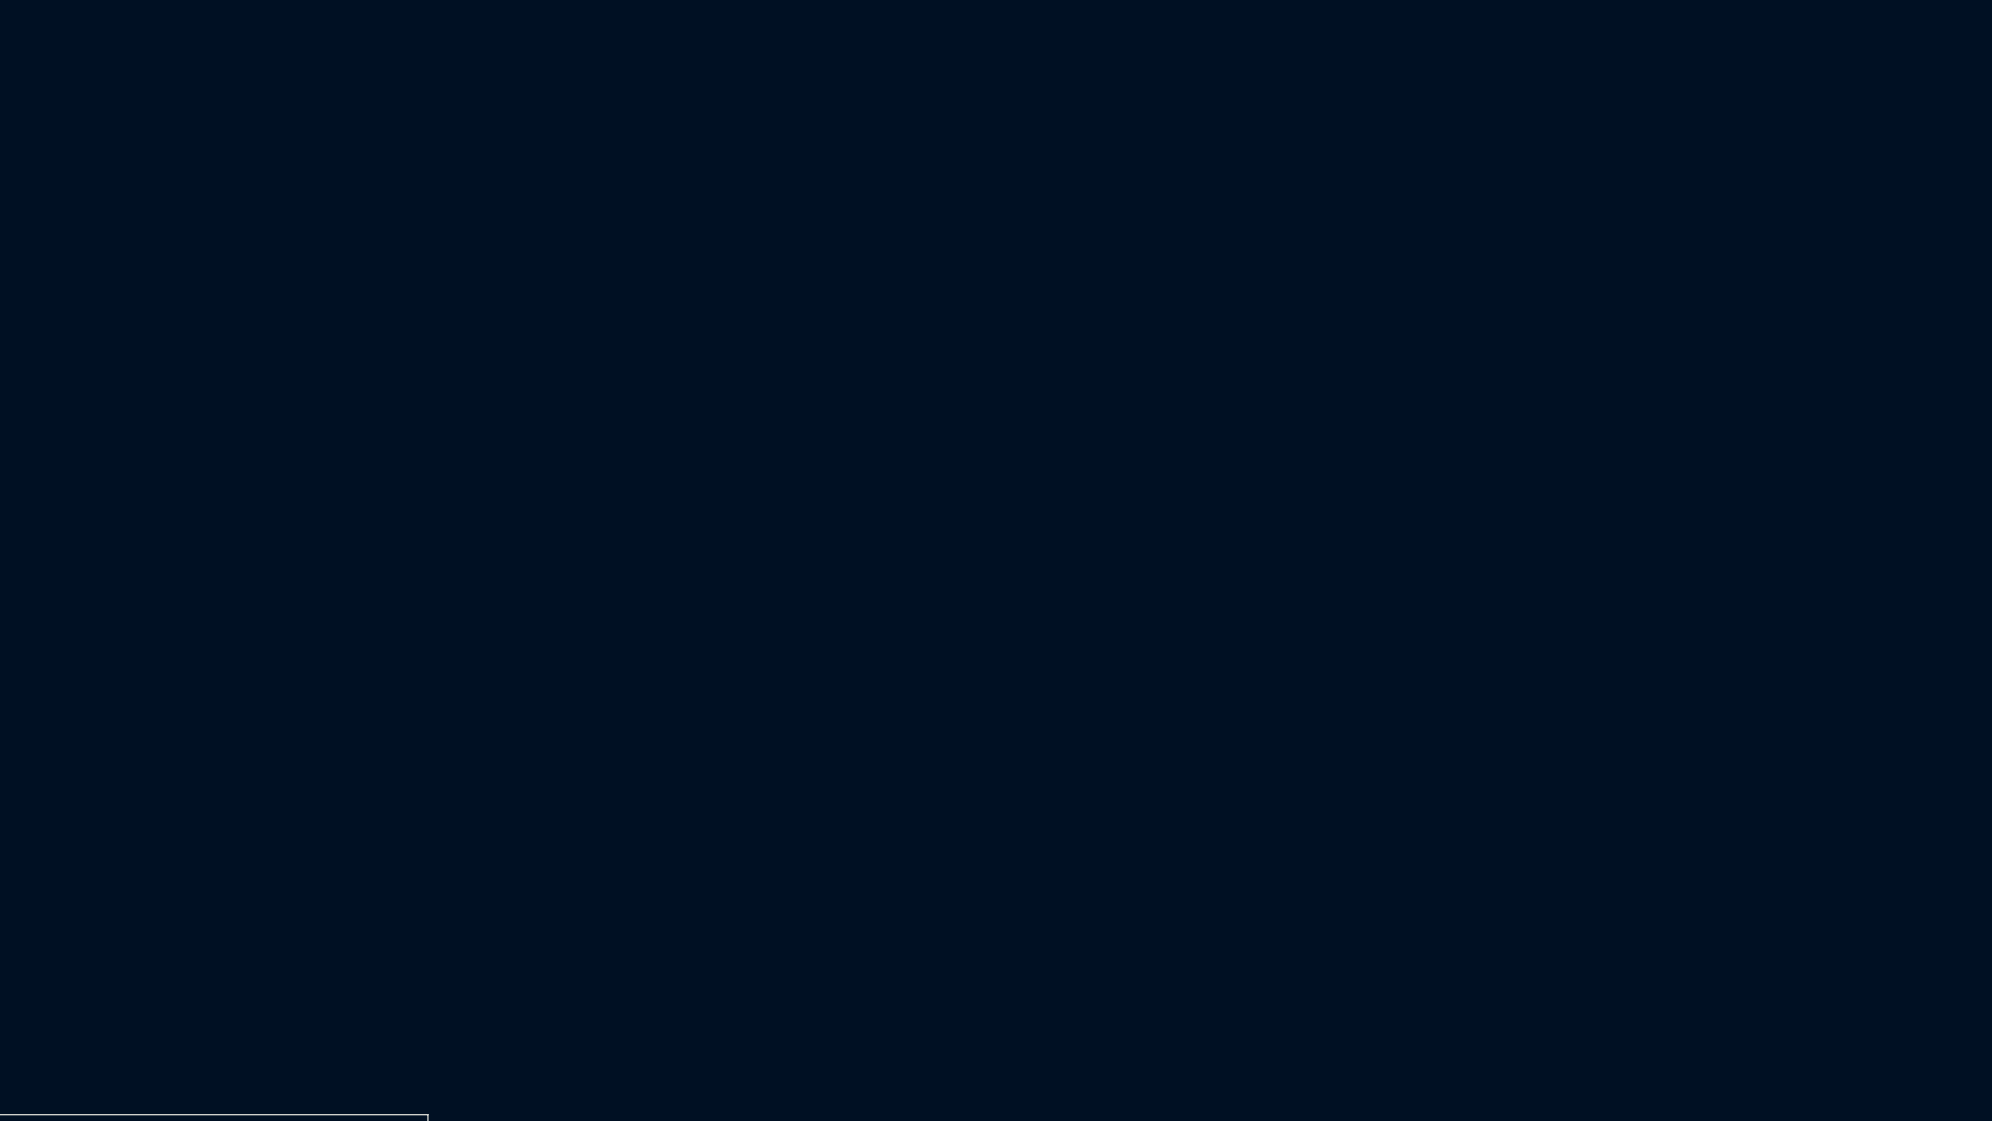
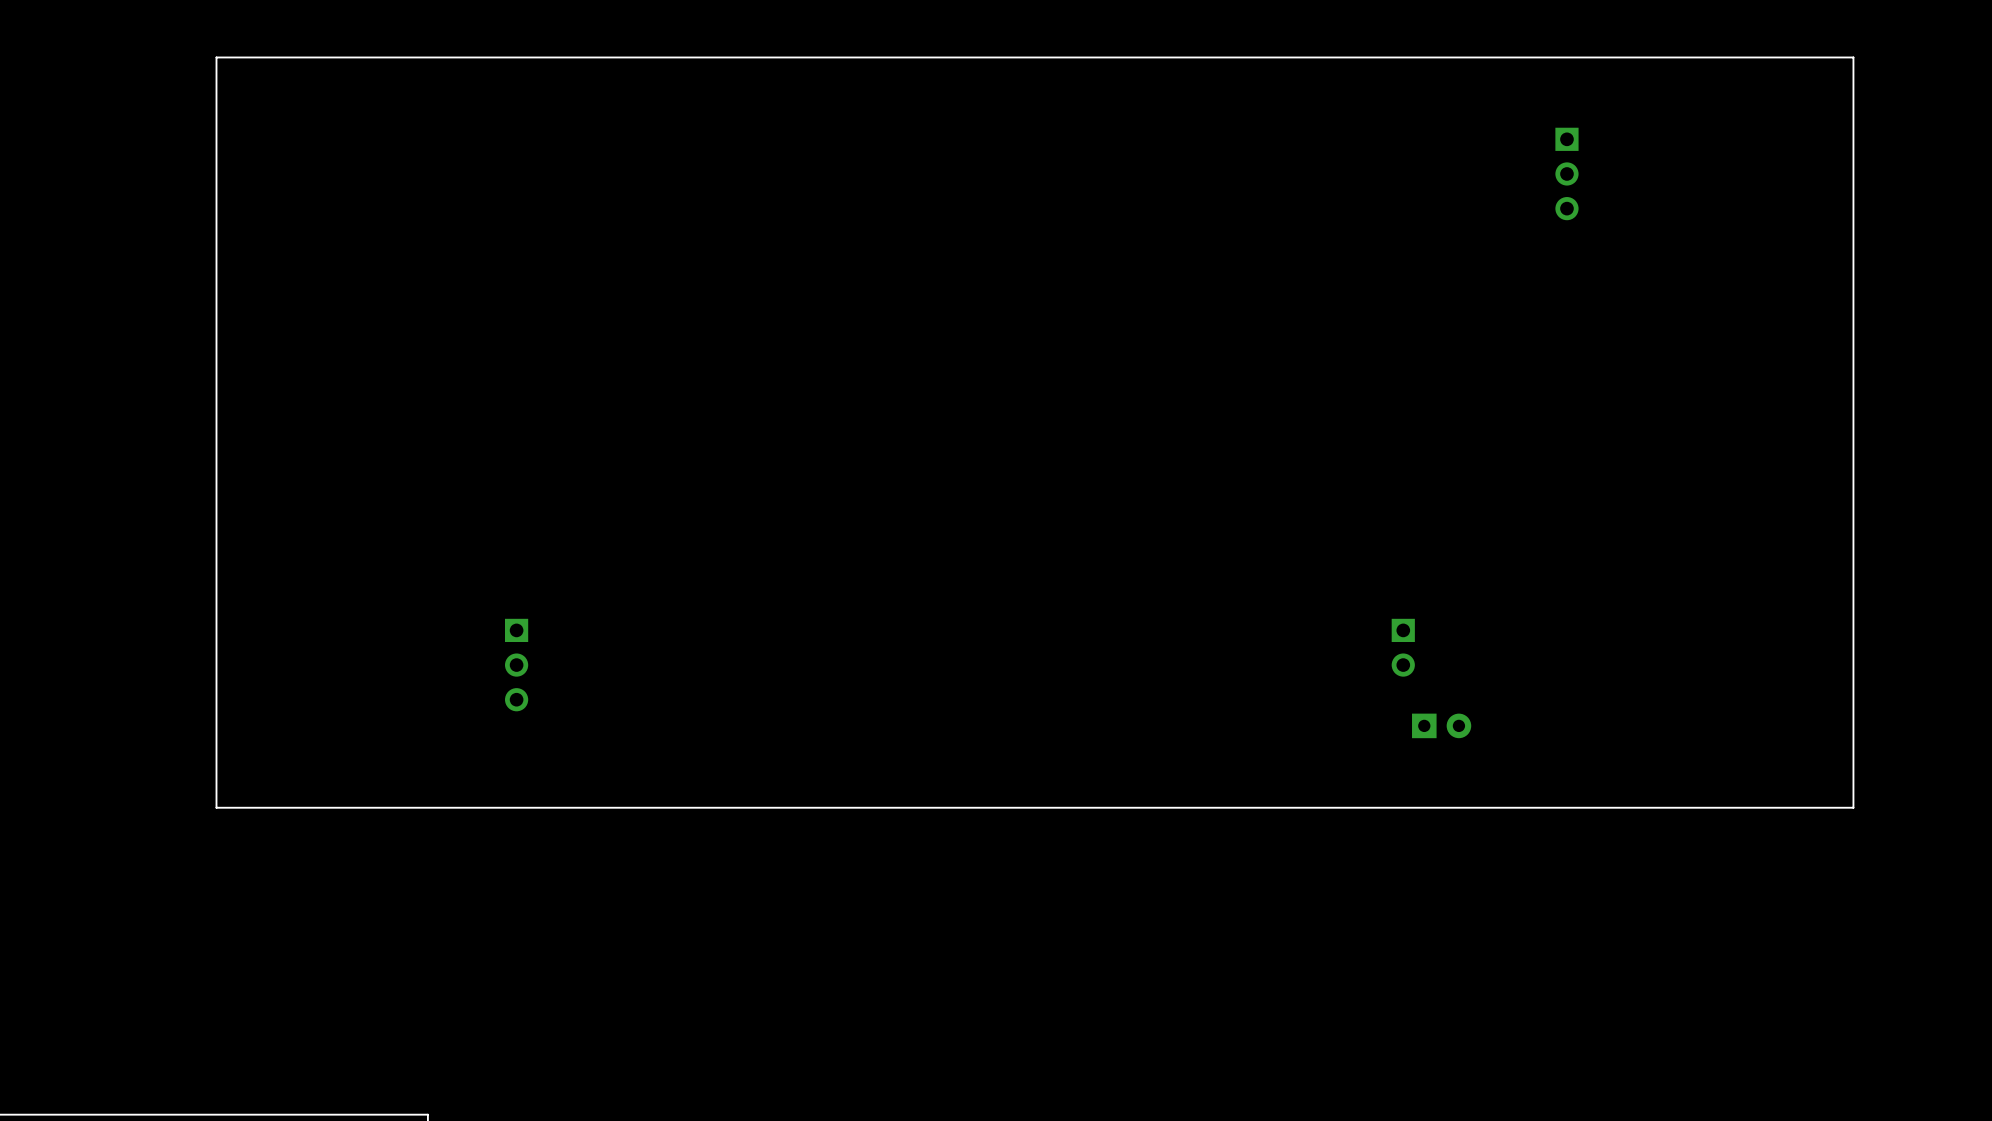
board edge: none -> (1853, 57) (216, 57) (216, 807) (1853, 807) (1853, 57)
part: none -> (1566, 173)
part: none -> (1403, 647)
part: none -> (516, 665)
part: none -> (1441, 725)

